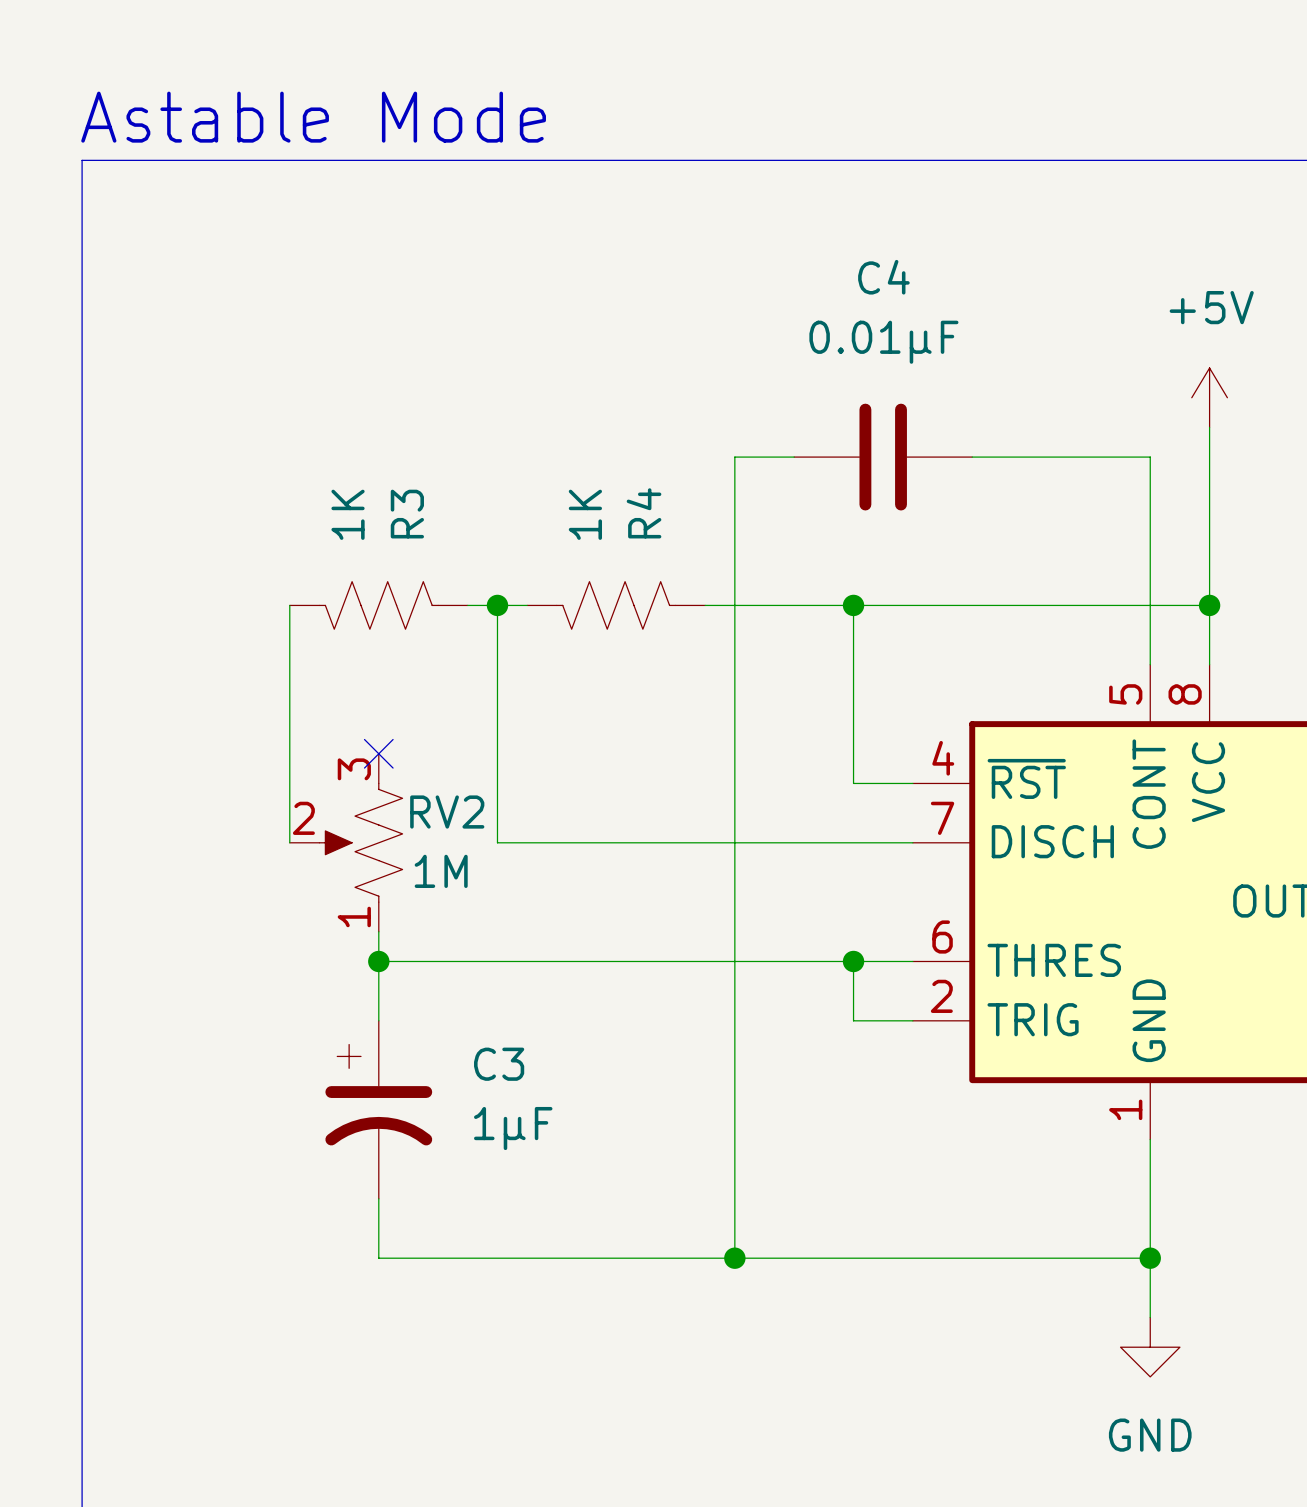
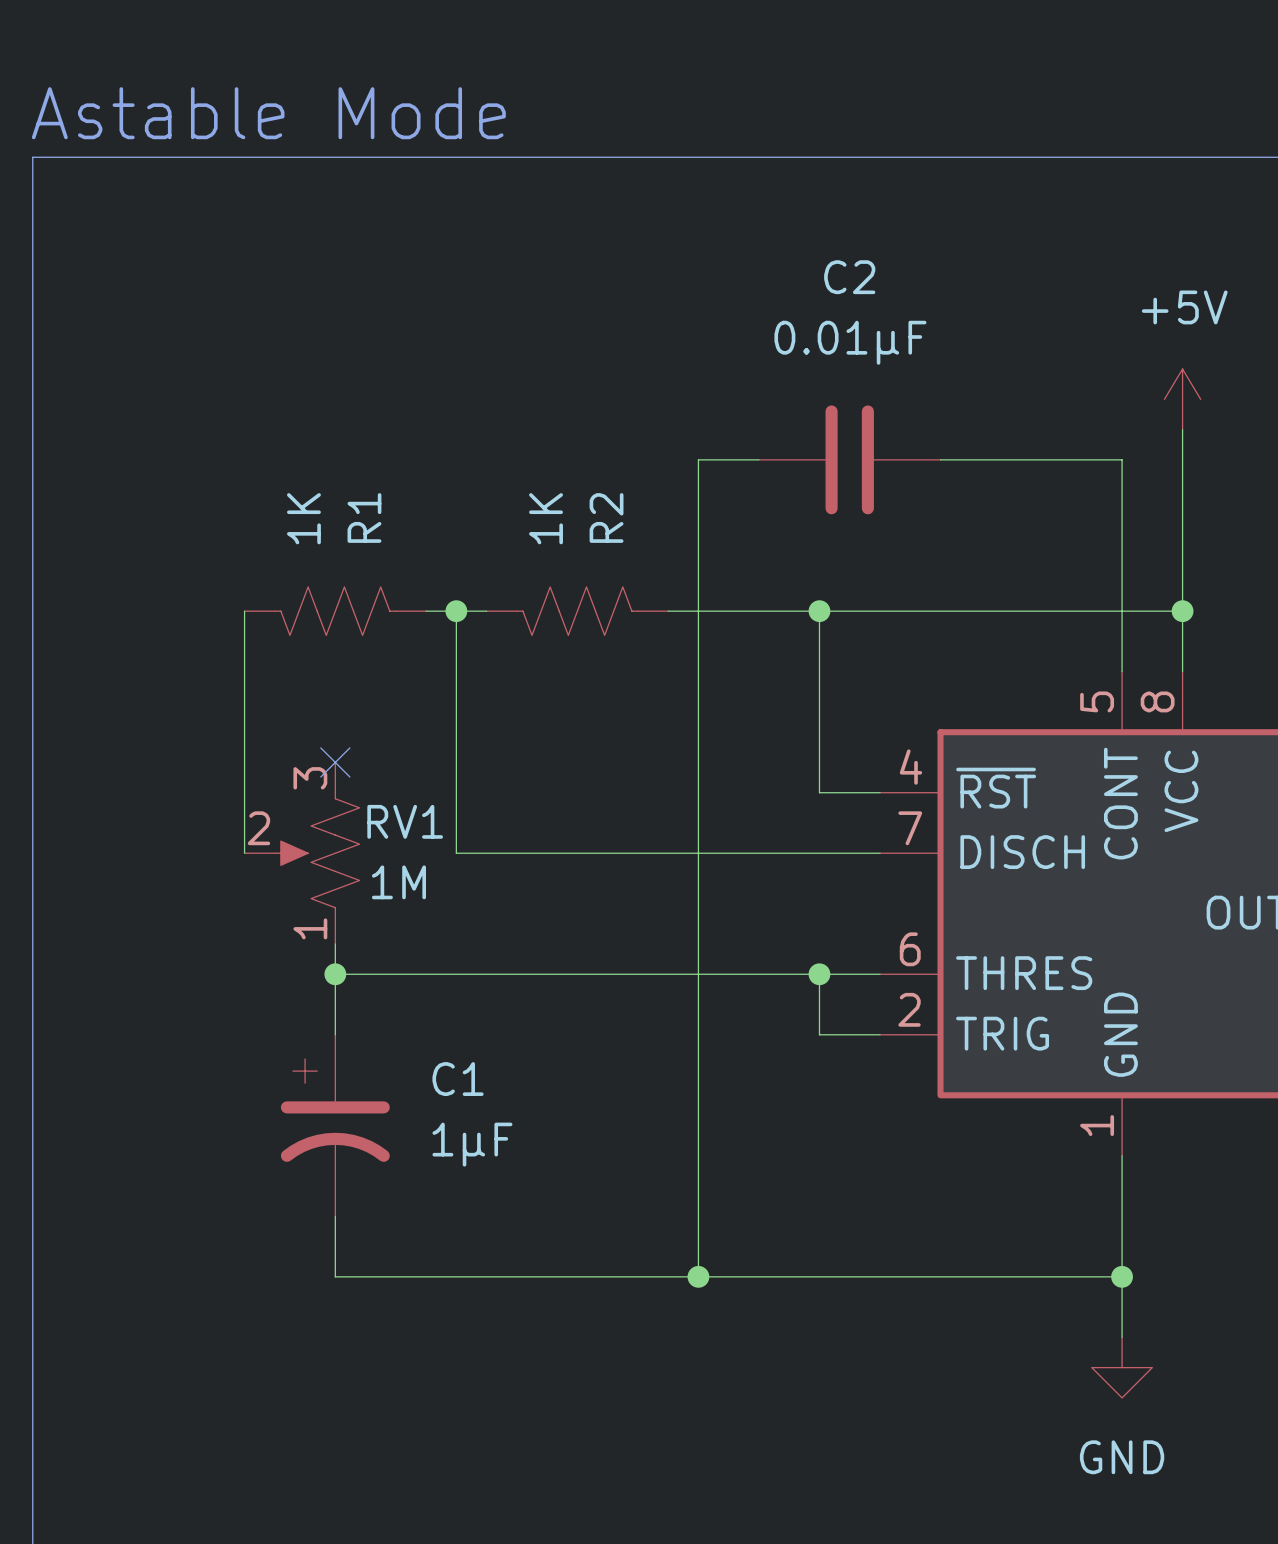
C4 name: C4 (883, 277) -> C2 (849, 277)
R4 name: R4 (644, 513) -> R2 (606, 518)
R3 name: R3 (407, 514) -> R1 (364, 518)
RV2 name: RV2 (447, 812) -> RV1 (405, 821)
C3 name: C3 (499, 1064) -> C1 (458, 1079)

